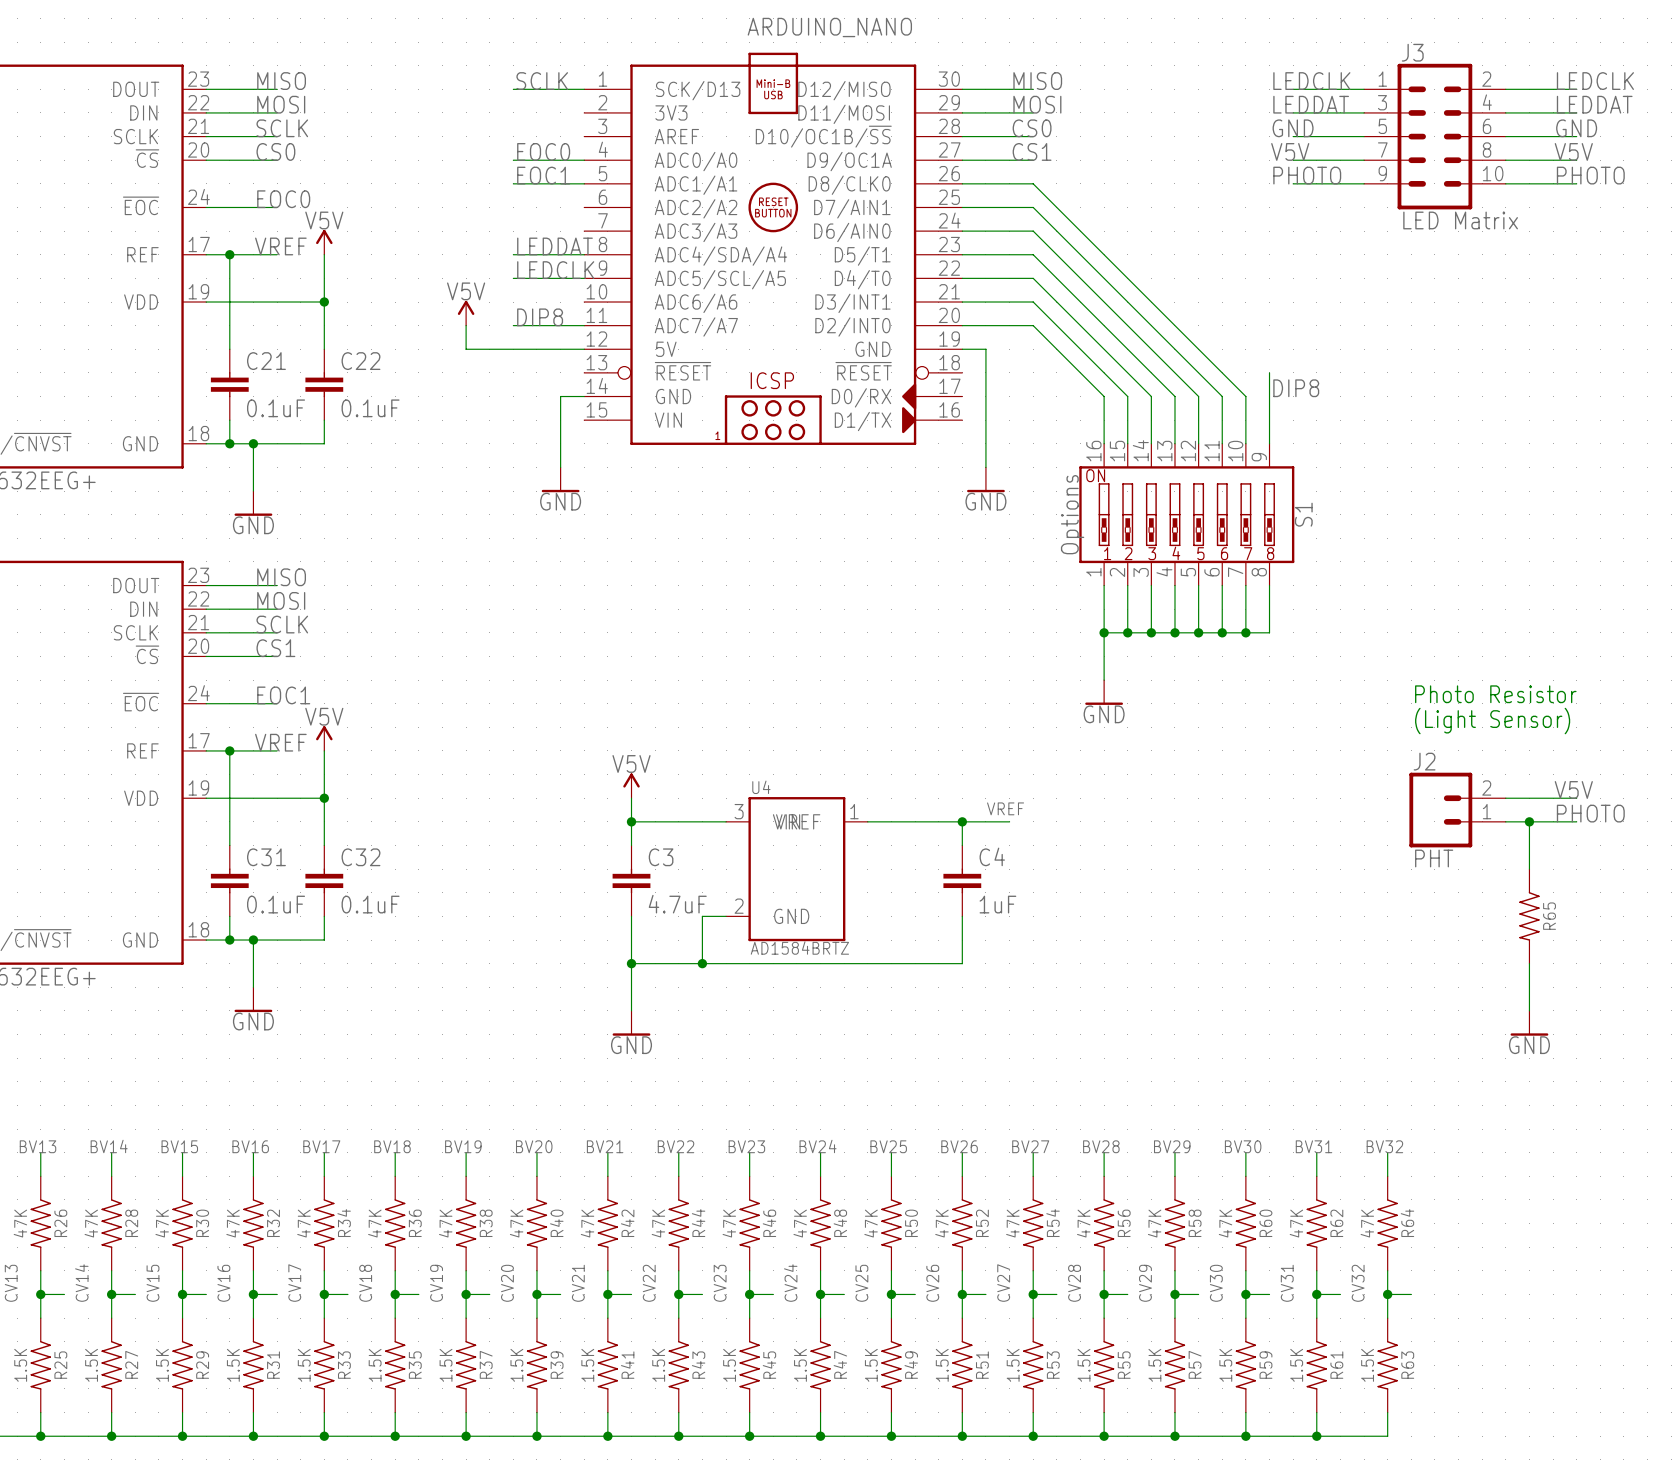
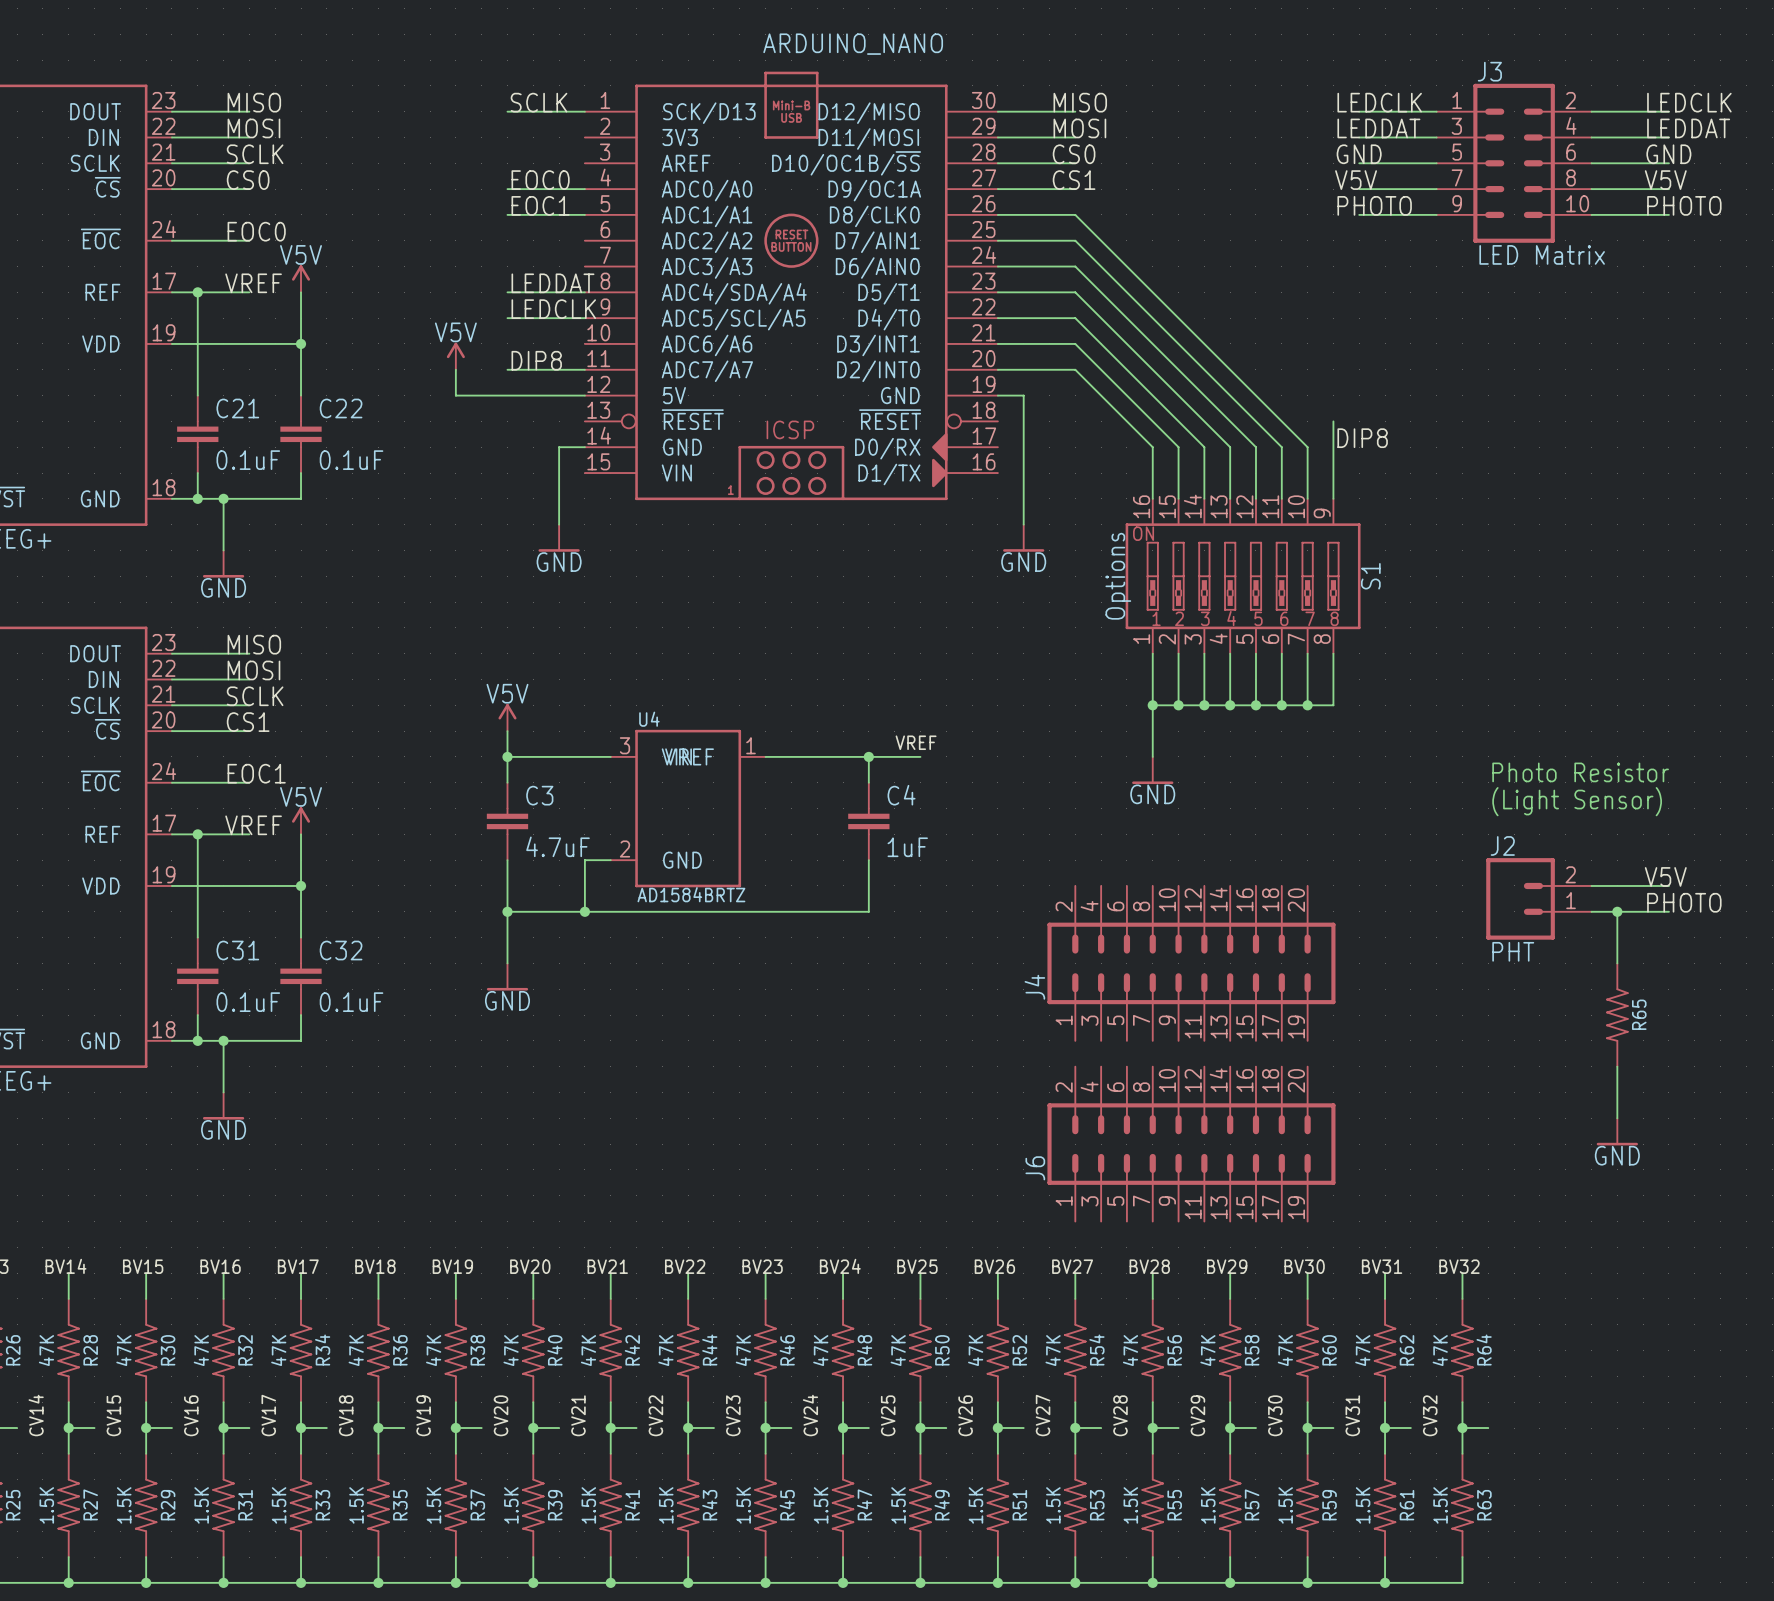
wire: none -> (507, 756) (610, 756)
junction: none -> (507, 756)
junction: none -> (868, 756)
wire: none -> (868, 860) (868, 911) (739, 911)
power symbol position: V5V (631, 785) -> V5V (507, 717)
wire: (631, 798) (631, 845) -> (507, 731) (507, 782)
label position: VREF (1005, 808) -> VREF (916, 742)
wire: none -> (507, 911) (636, 911)
junction: none -> (507, 911)
junction position: (631, 821) -> (584, 911)
wire: (867, 821) (1009, 821) -> (765, 756) (920, 756)
wire: (962, 821) (962, 845) -> (868, 756) (868, 782)
junction: (962, 821) -> none
U4 position: (796, 869) -> (688, 808)
J4: none -> (1191, 963)
C3 position: (631, 880) -> (507, 821)
C4 position: (962, 880) -> (868, 821)
wire: (631, 916) (631, 1010) -> (507, 860) (507, 963)
wire: (726, 916) (702, 916) (702, 963) -> (610, 860) (584, 860) (584, 911)
wire: (962, 916) (962, 963) (631, 963) -> none
junction: (631, 963) -> none
junction: (702, 963) -> none
power symbol position: GND (631, 1023) -> GND (507, 976)
J6: none -> (1191, 1144)

